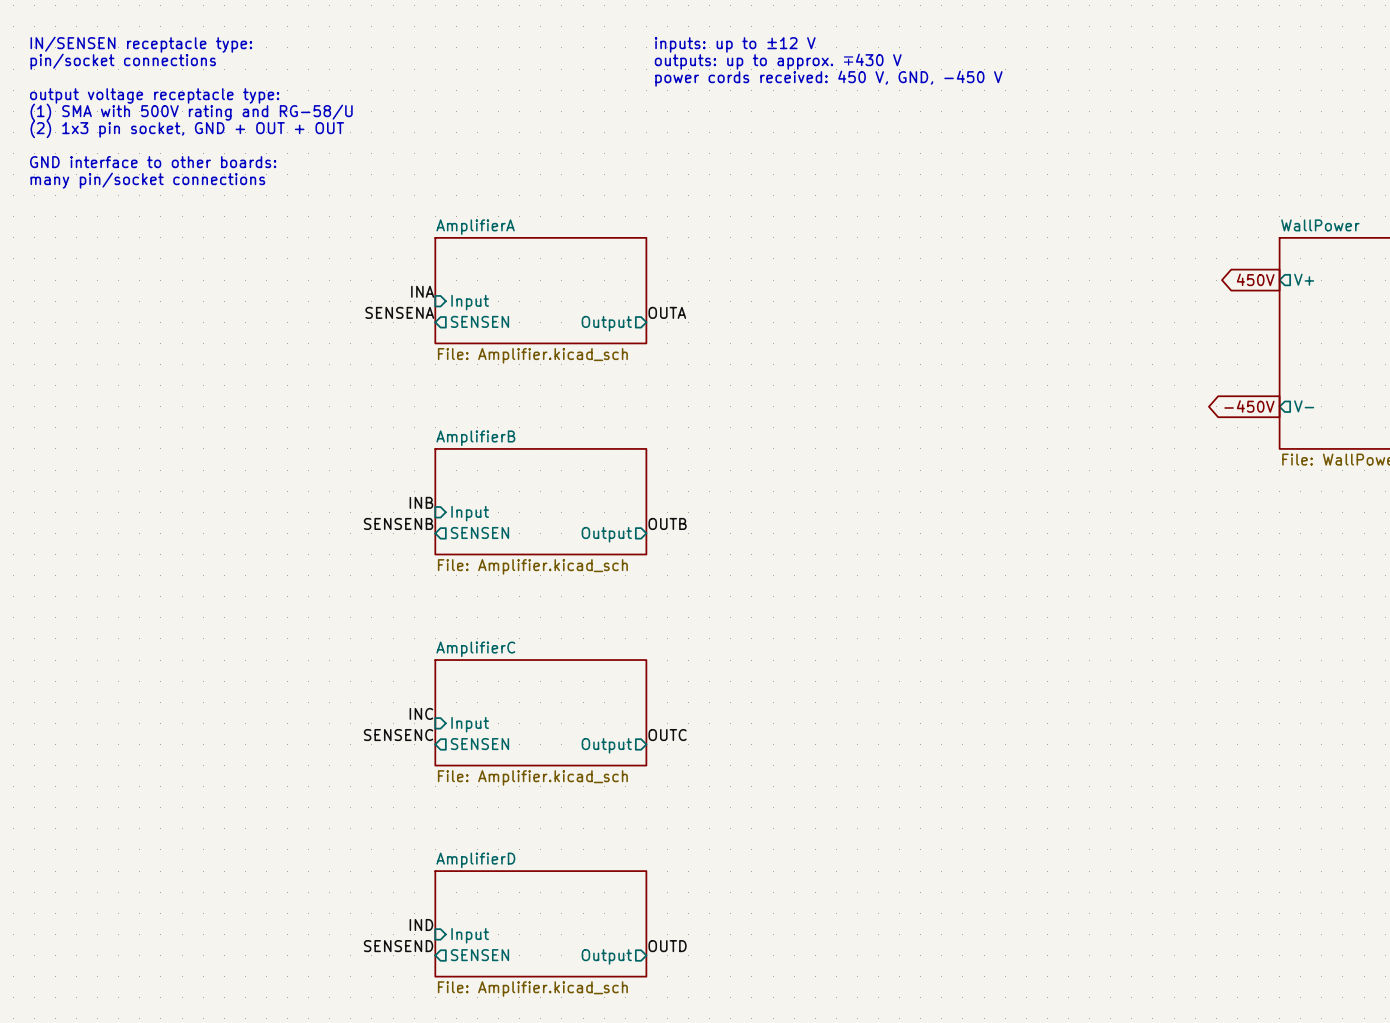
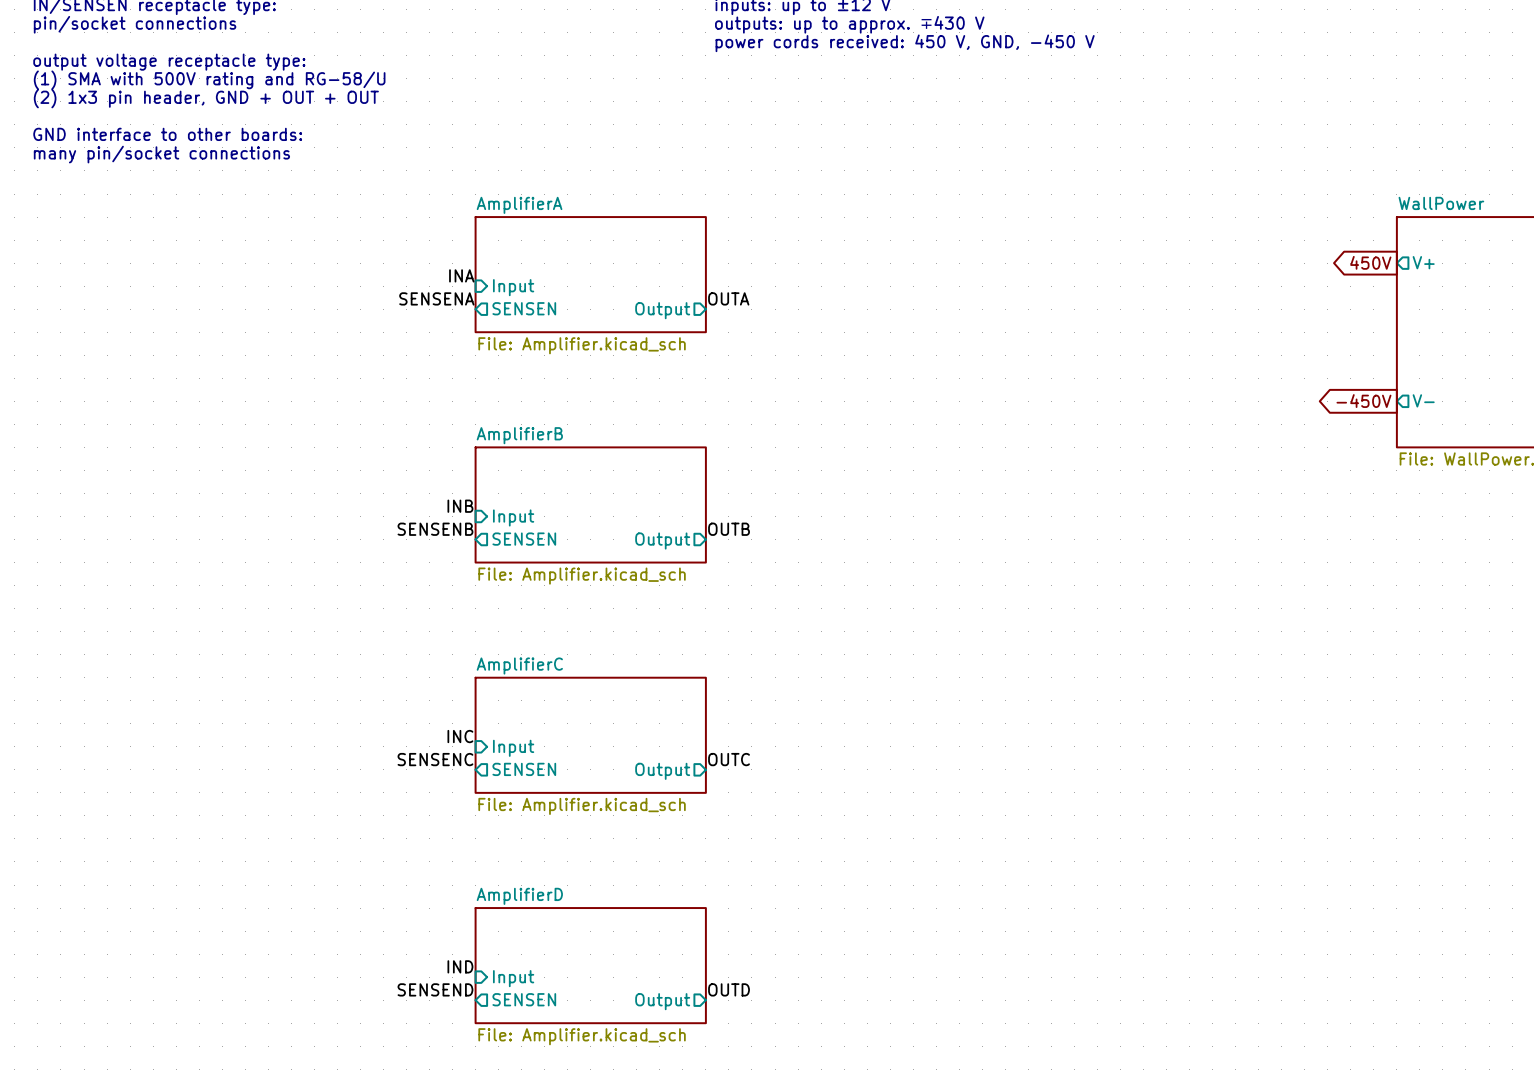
text: (2) 1x3 pin socket, GND + OUT + OUT (187, 129) -> (2) 1x3 pin header, GND + OUT + OUT (206, 98)

